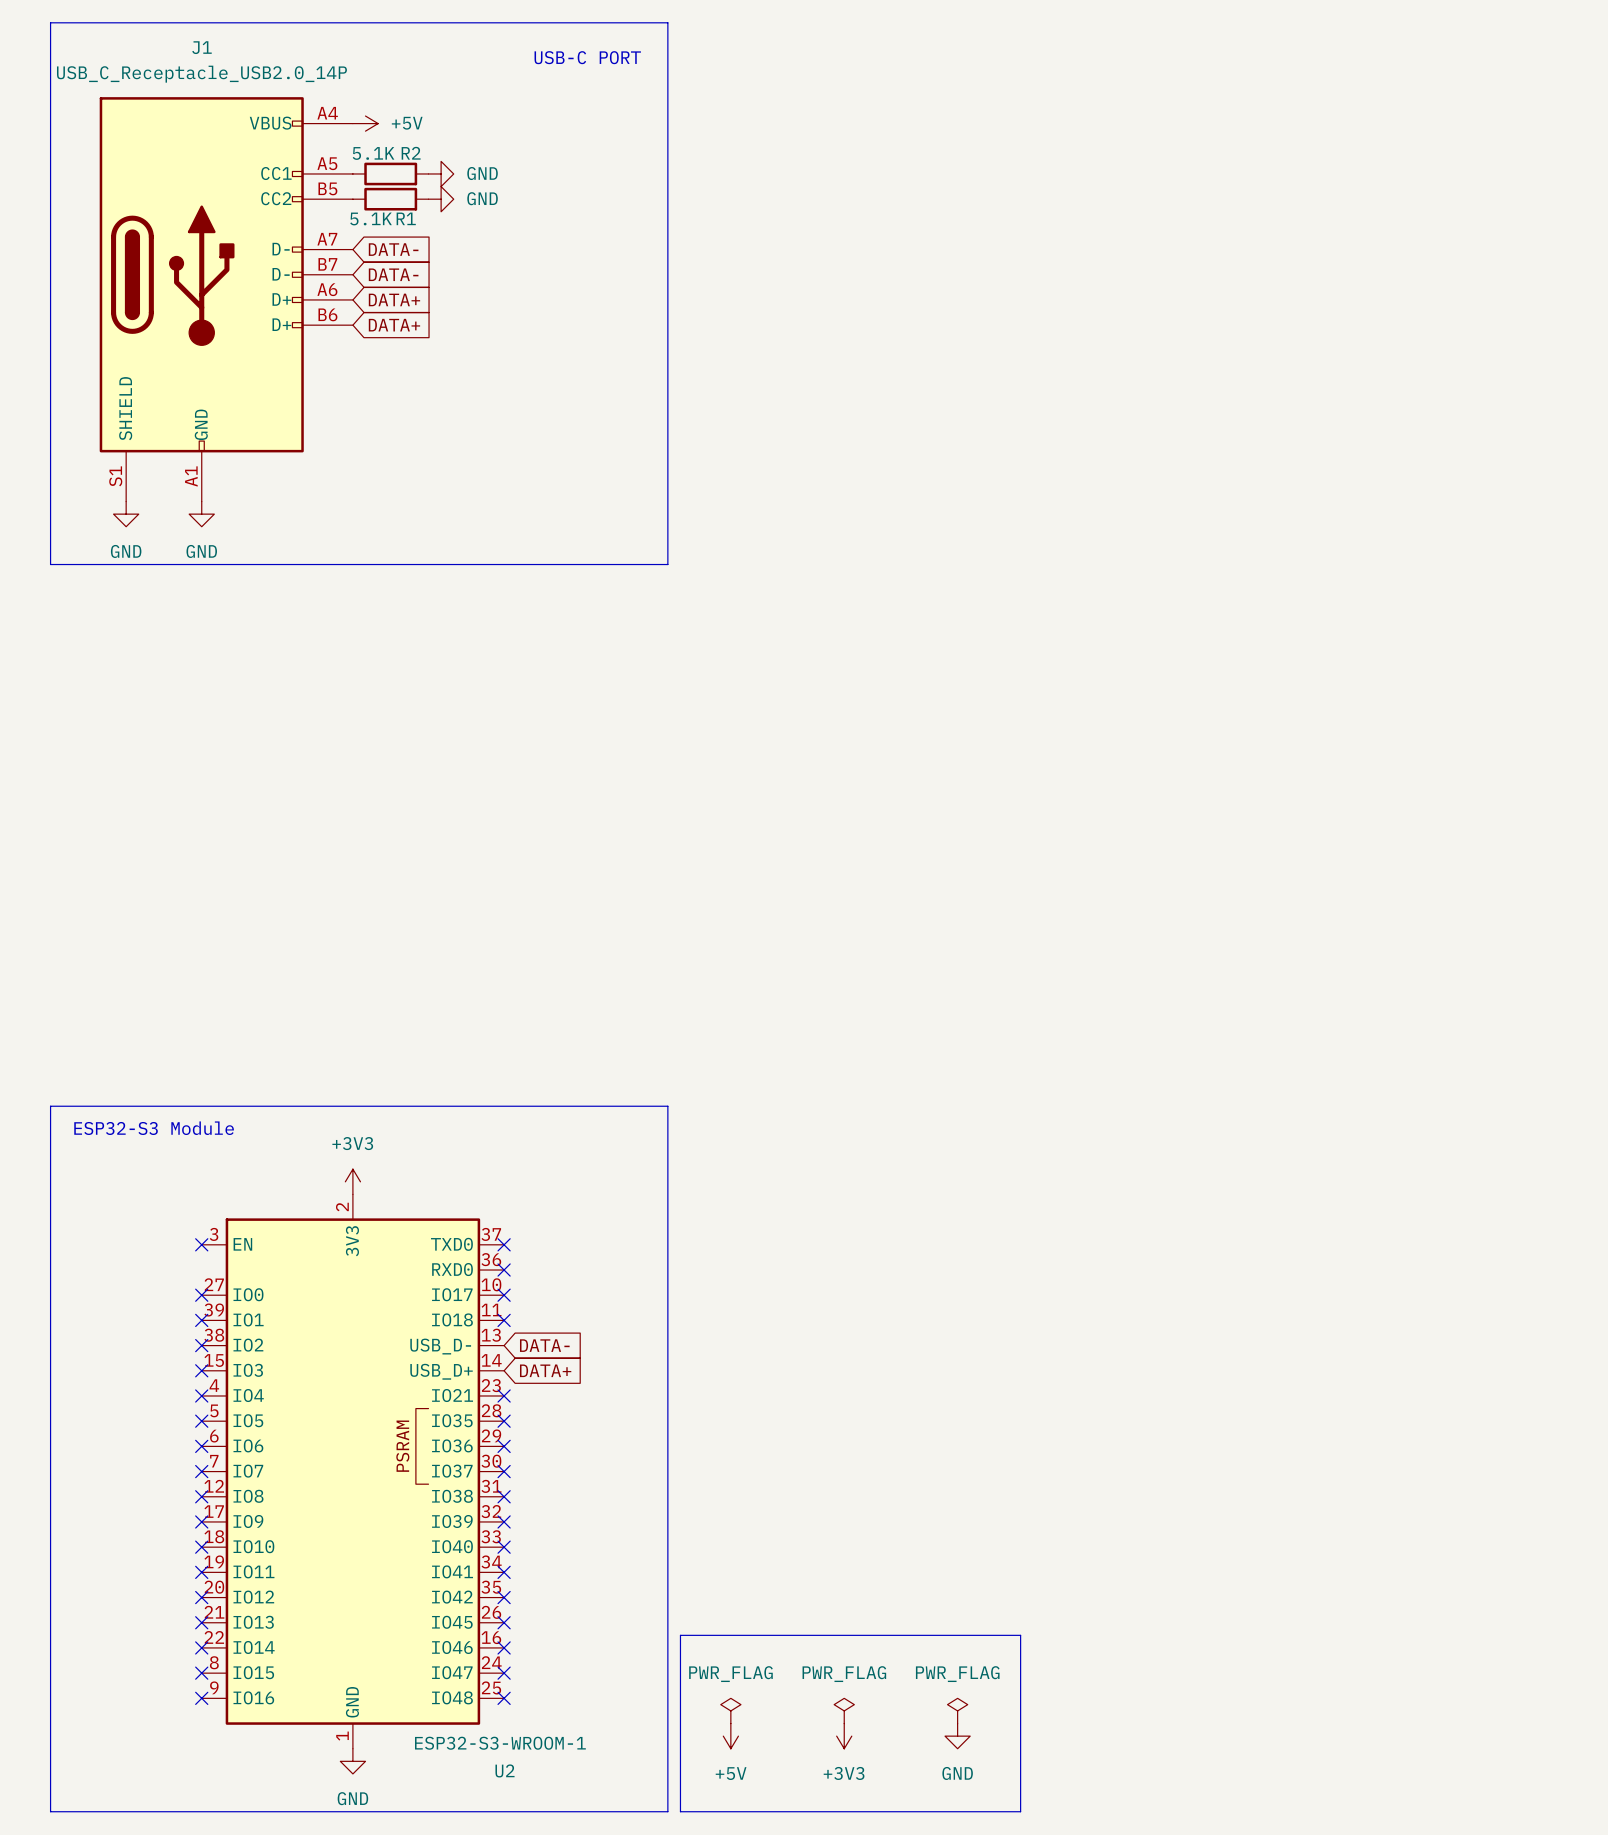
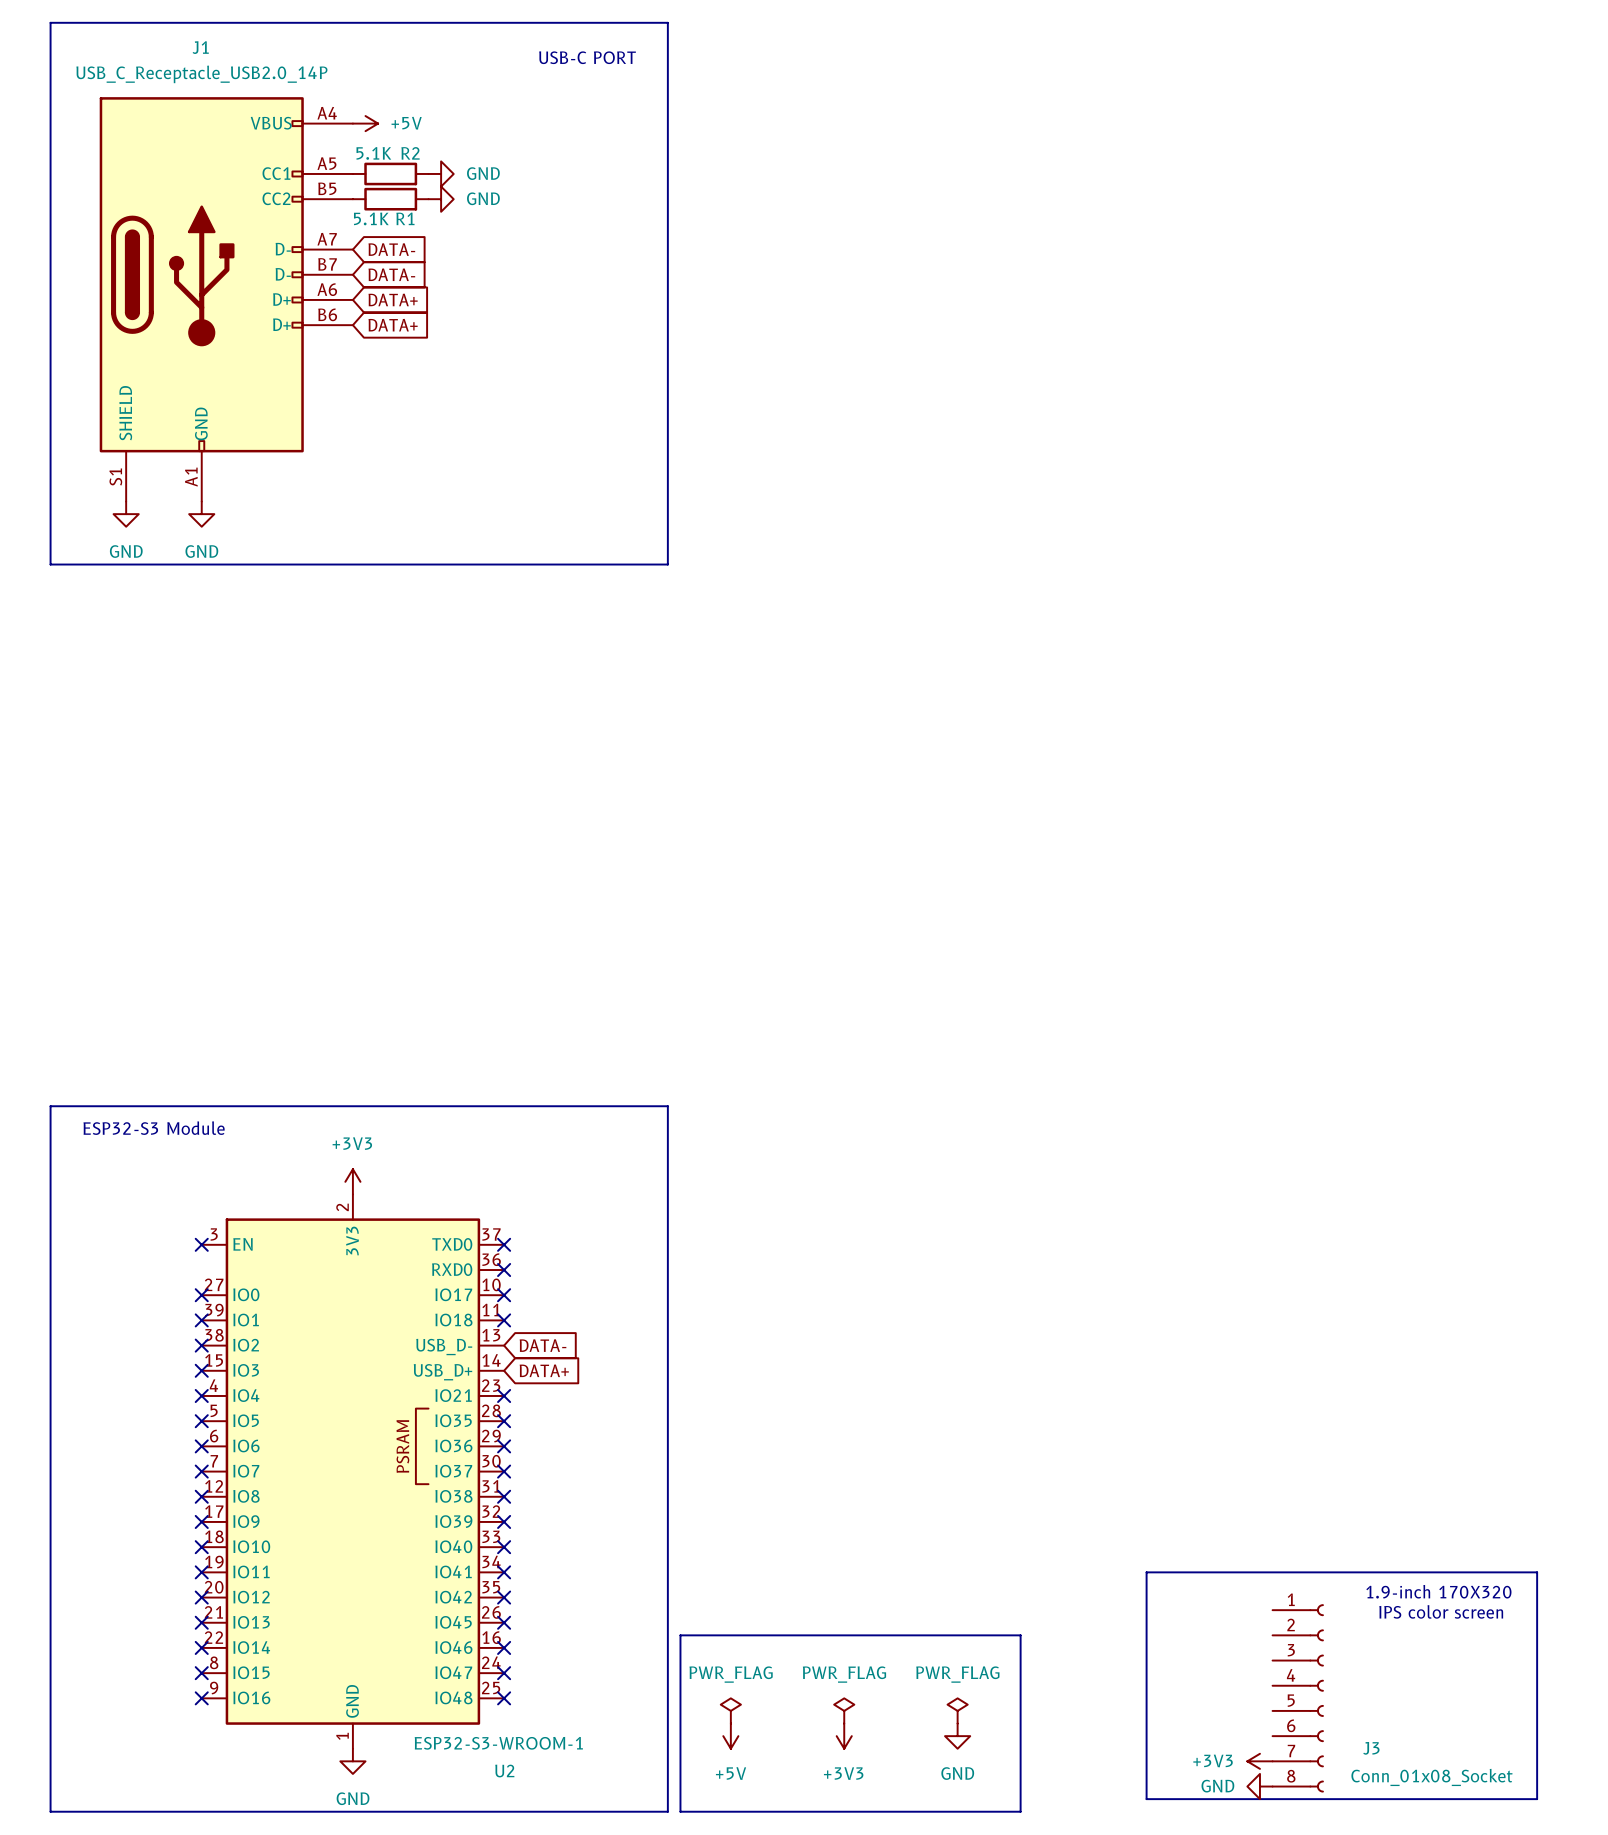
line: none -> (1146, 1572) (1537, 1572) (1537, 1799) (1146, 1799) (1146, 1572)
text: none -> 1.9-inch 170X320 (1438, 1591)
text: none -> IPS color screen (1441, 1611)
J3: none -> Conn_01x08_Socket (1298, 1698)
power symbol: none -> +3V3 (1259, 1761)
power symbol: none -> GND (1259, 1786)

